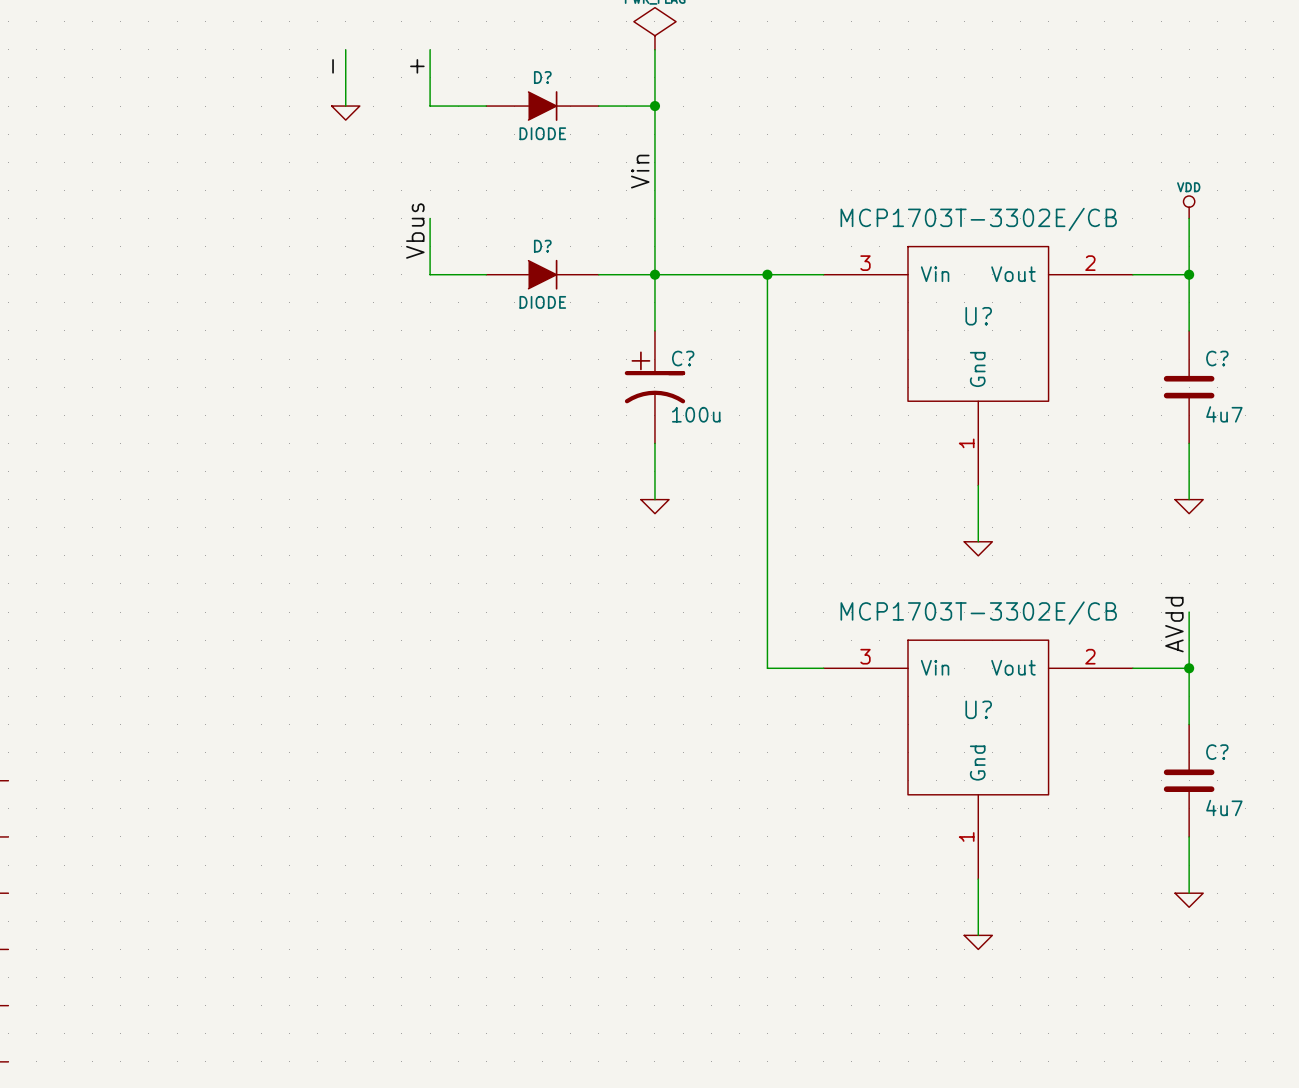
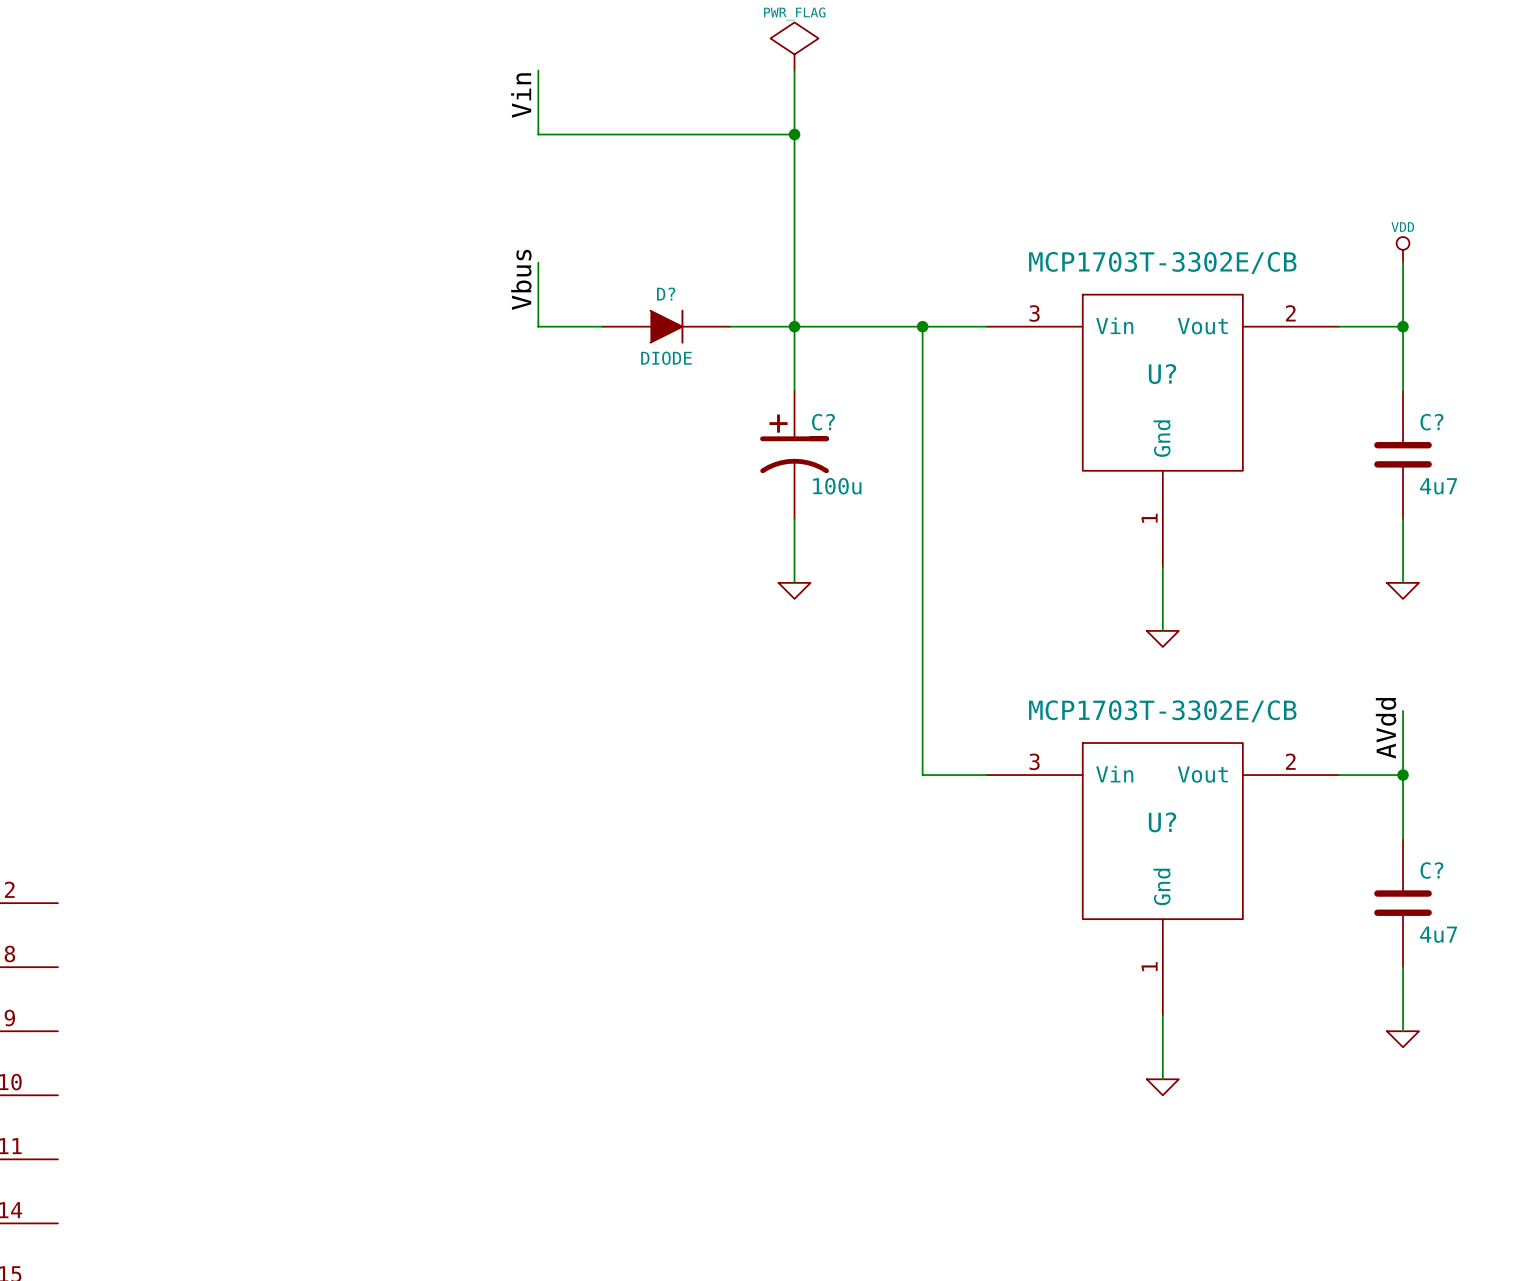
wire: (345, 49) (345, 106) -> none
label: - (333, 66) -> none
label: + (417, 66) -> none
D?: DIODE (542, 106) -> none
power symbol: (345, 113) -> none
label position: Vin (640, 171) -> Vin (521, 95)

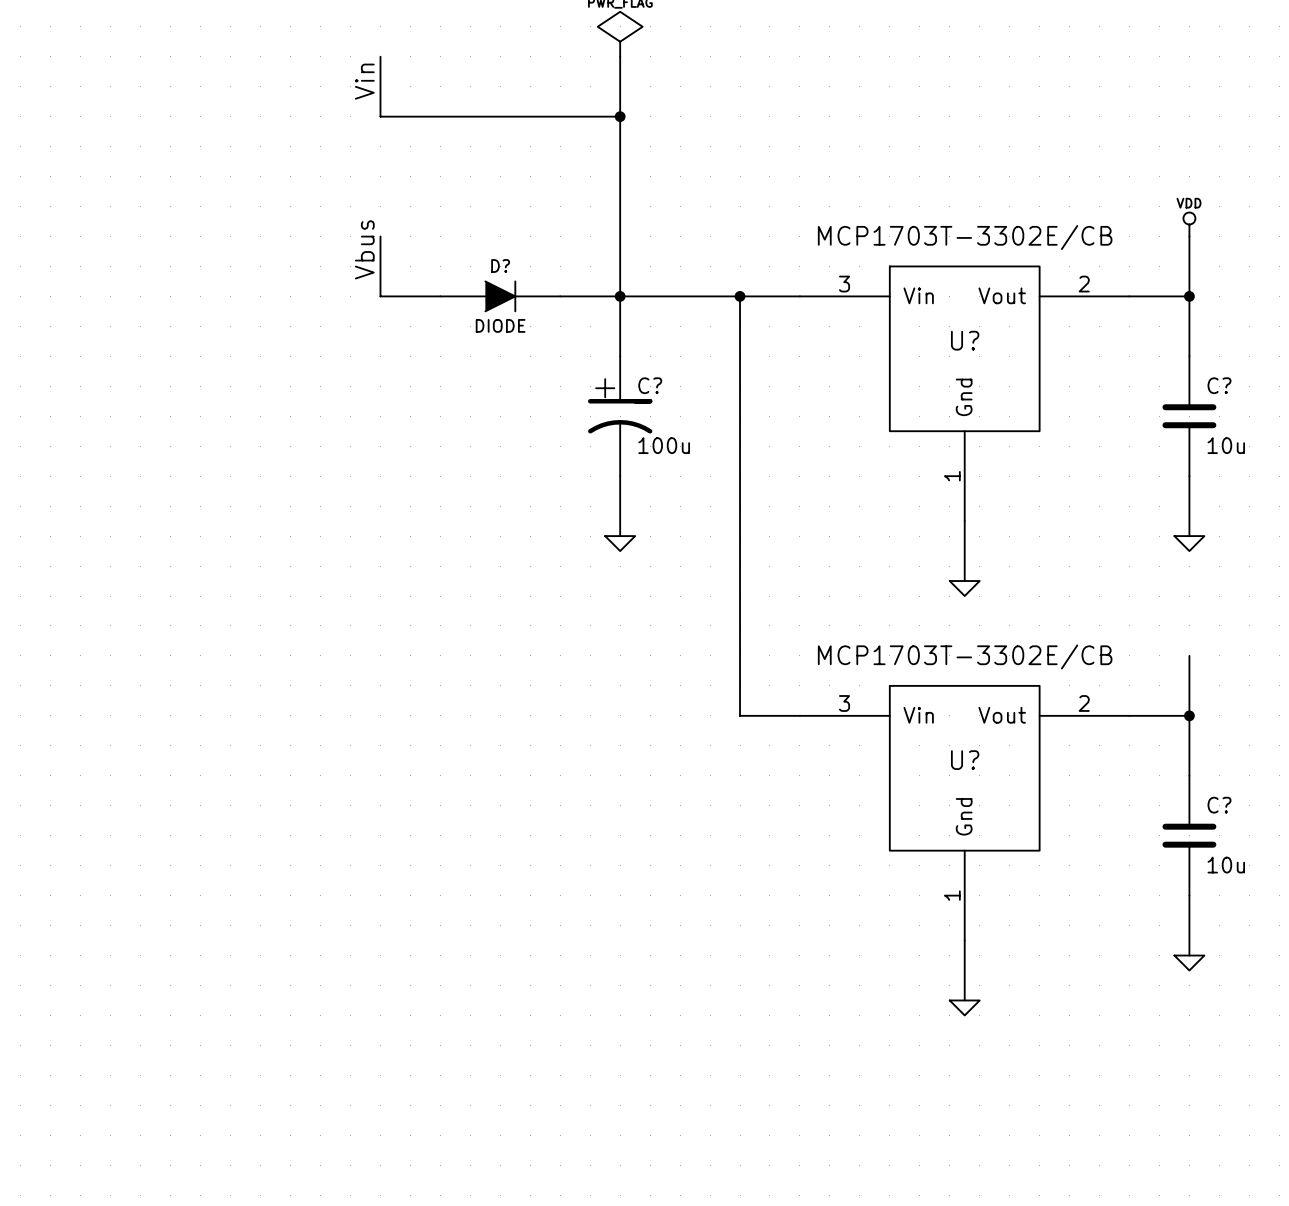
C? value: 4u7 (1438, 486) -> 10u (1226, 445)
label: AVdd (1386, 728) -> none
C? value: 4u7 (1438, 934) -> 10u (1226, 865)

